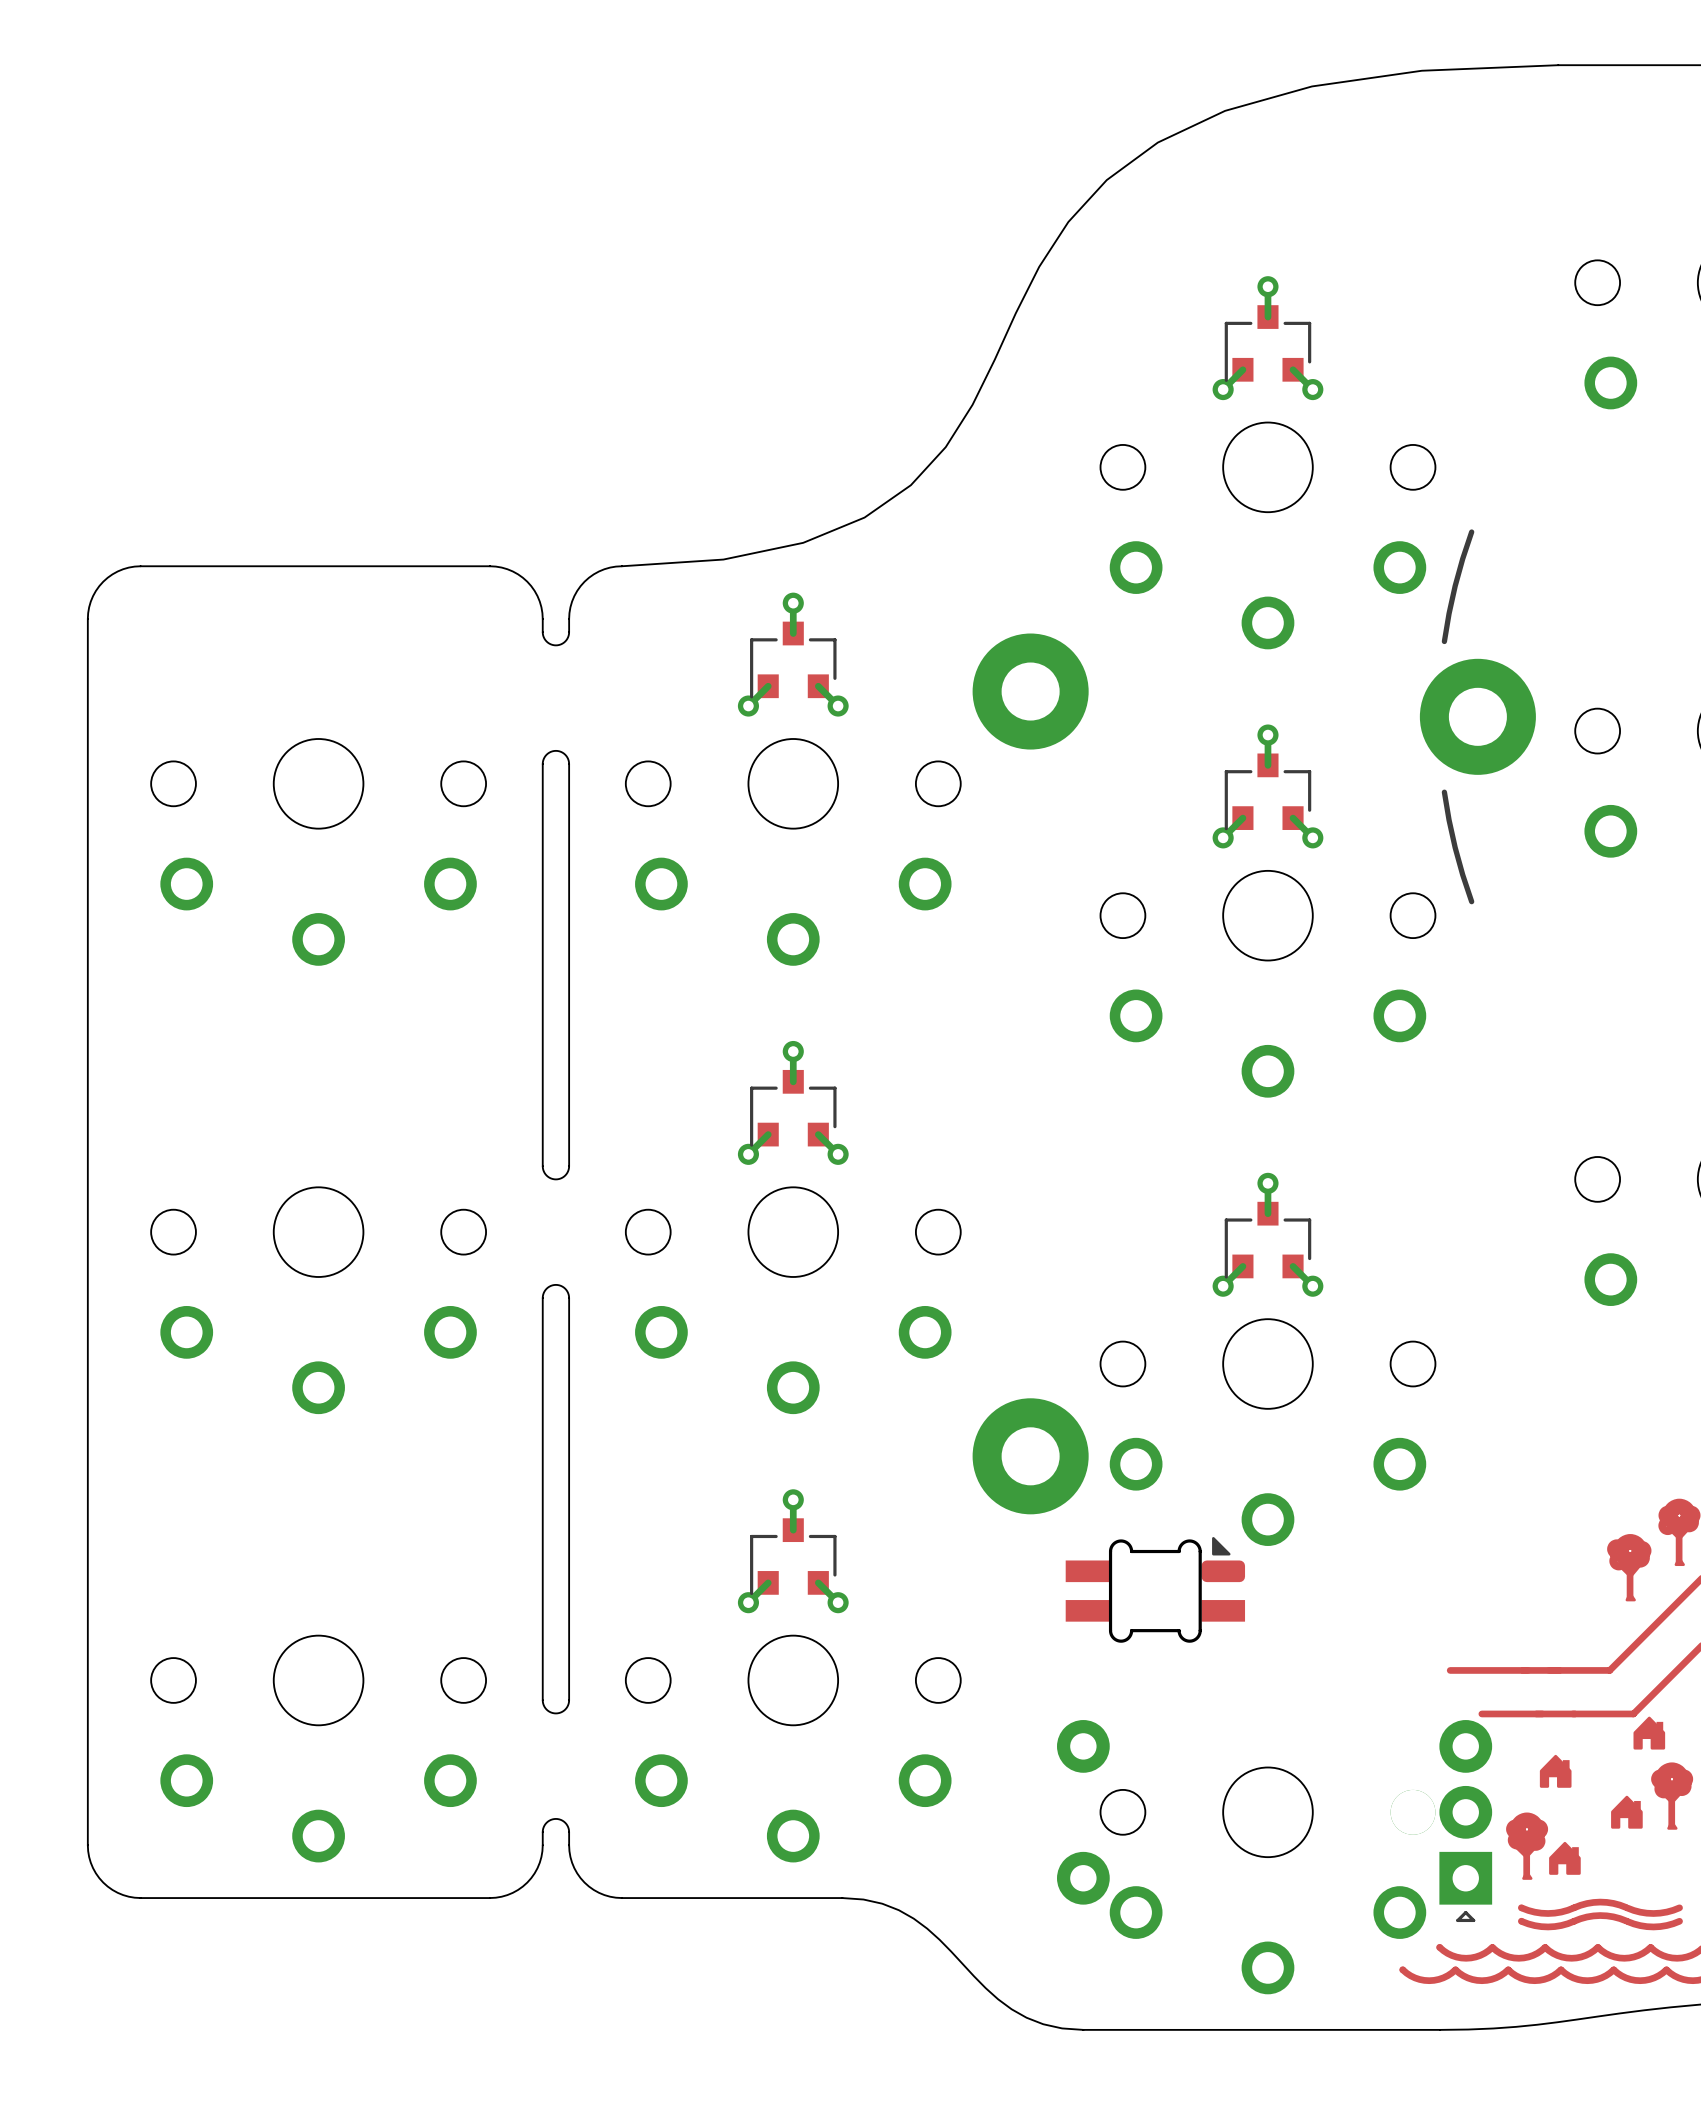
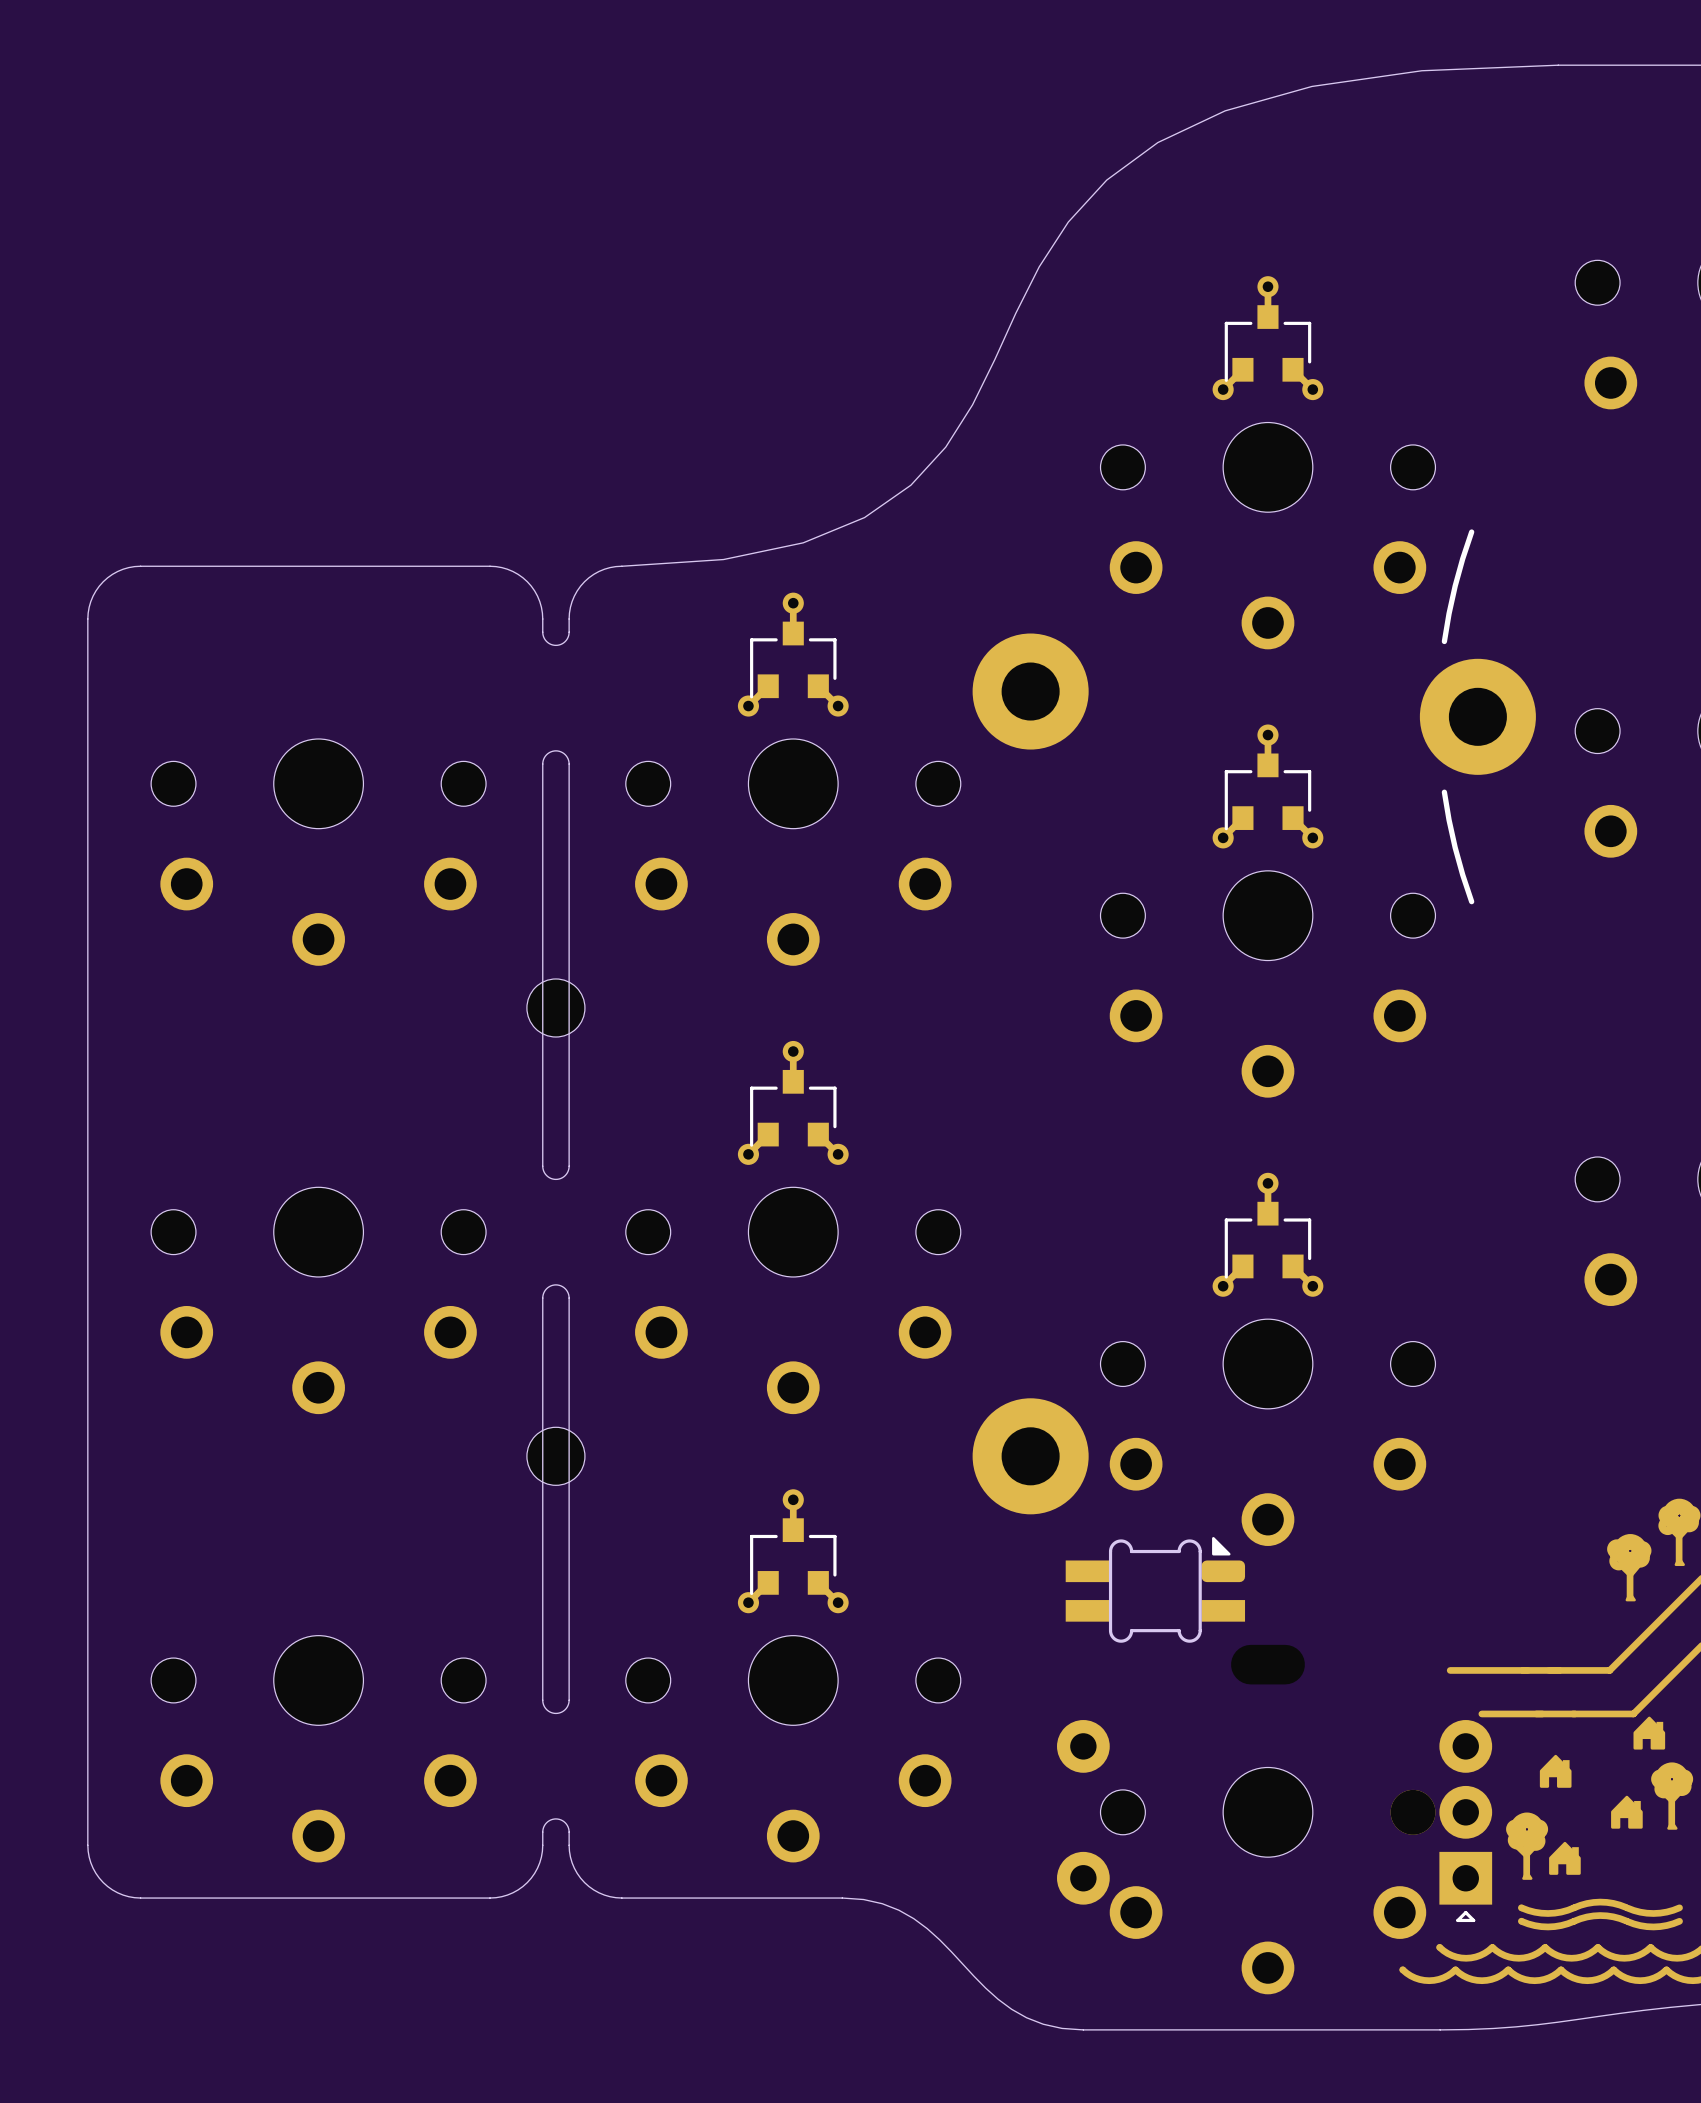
part: none -> (555, 1007)
part: none -> (555, 1456)

